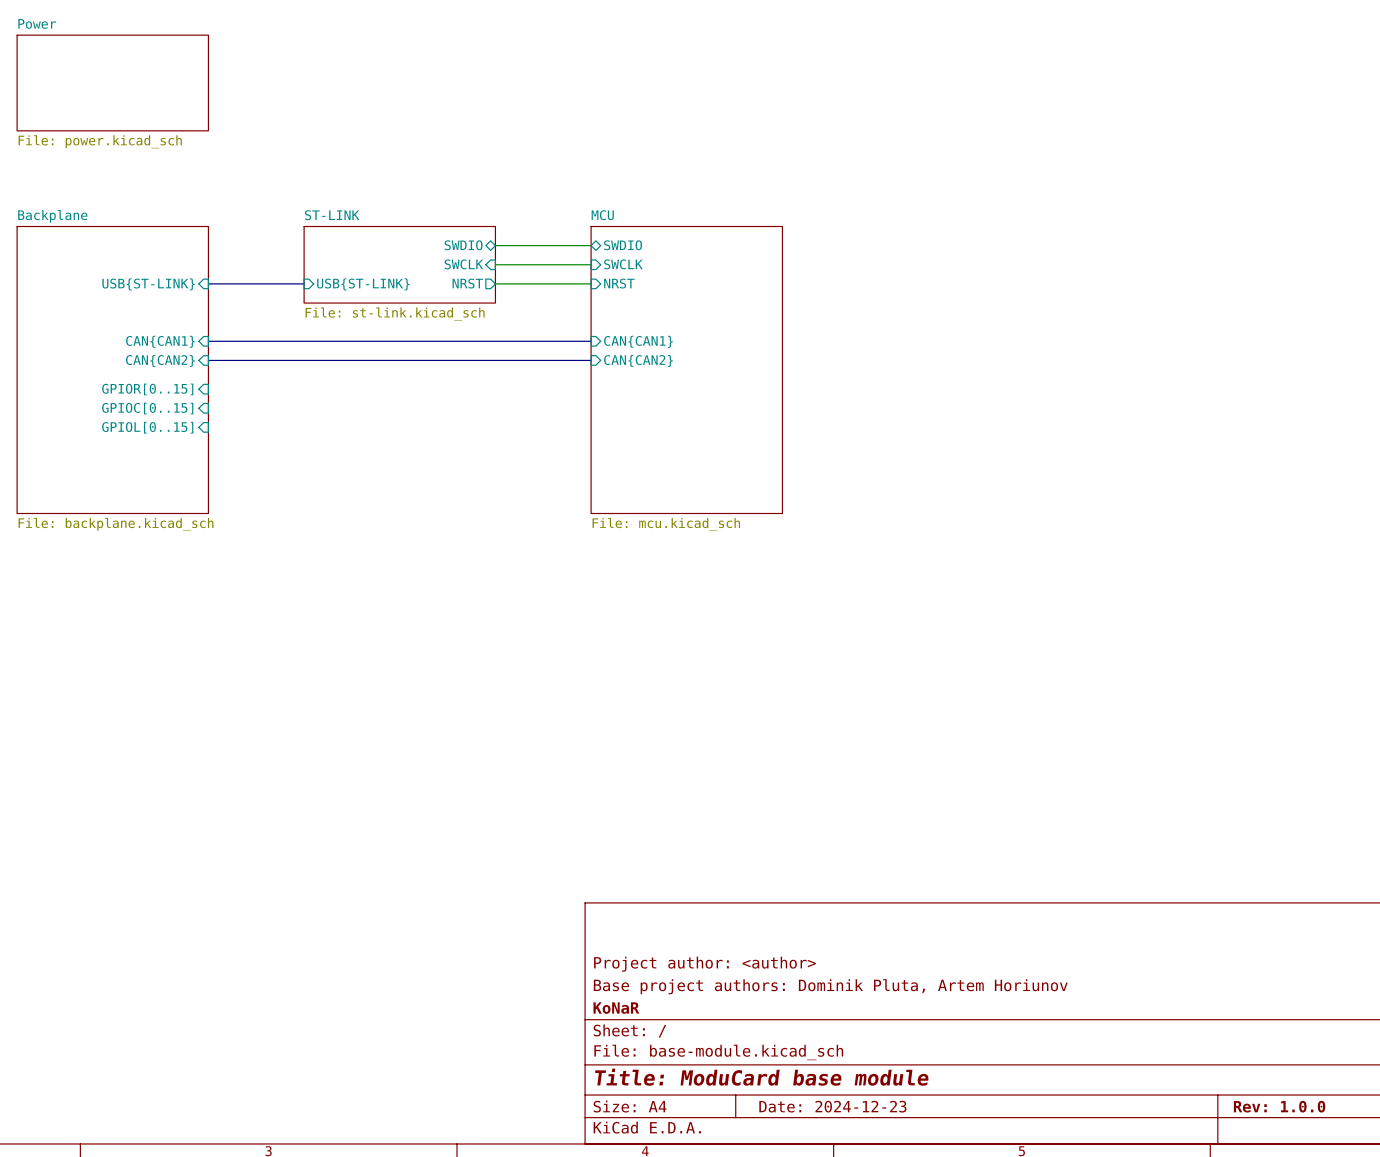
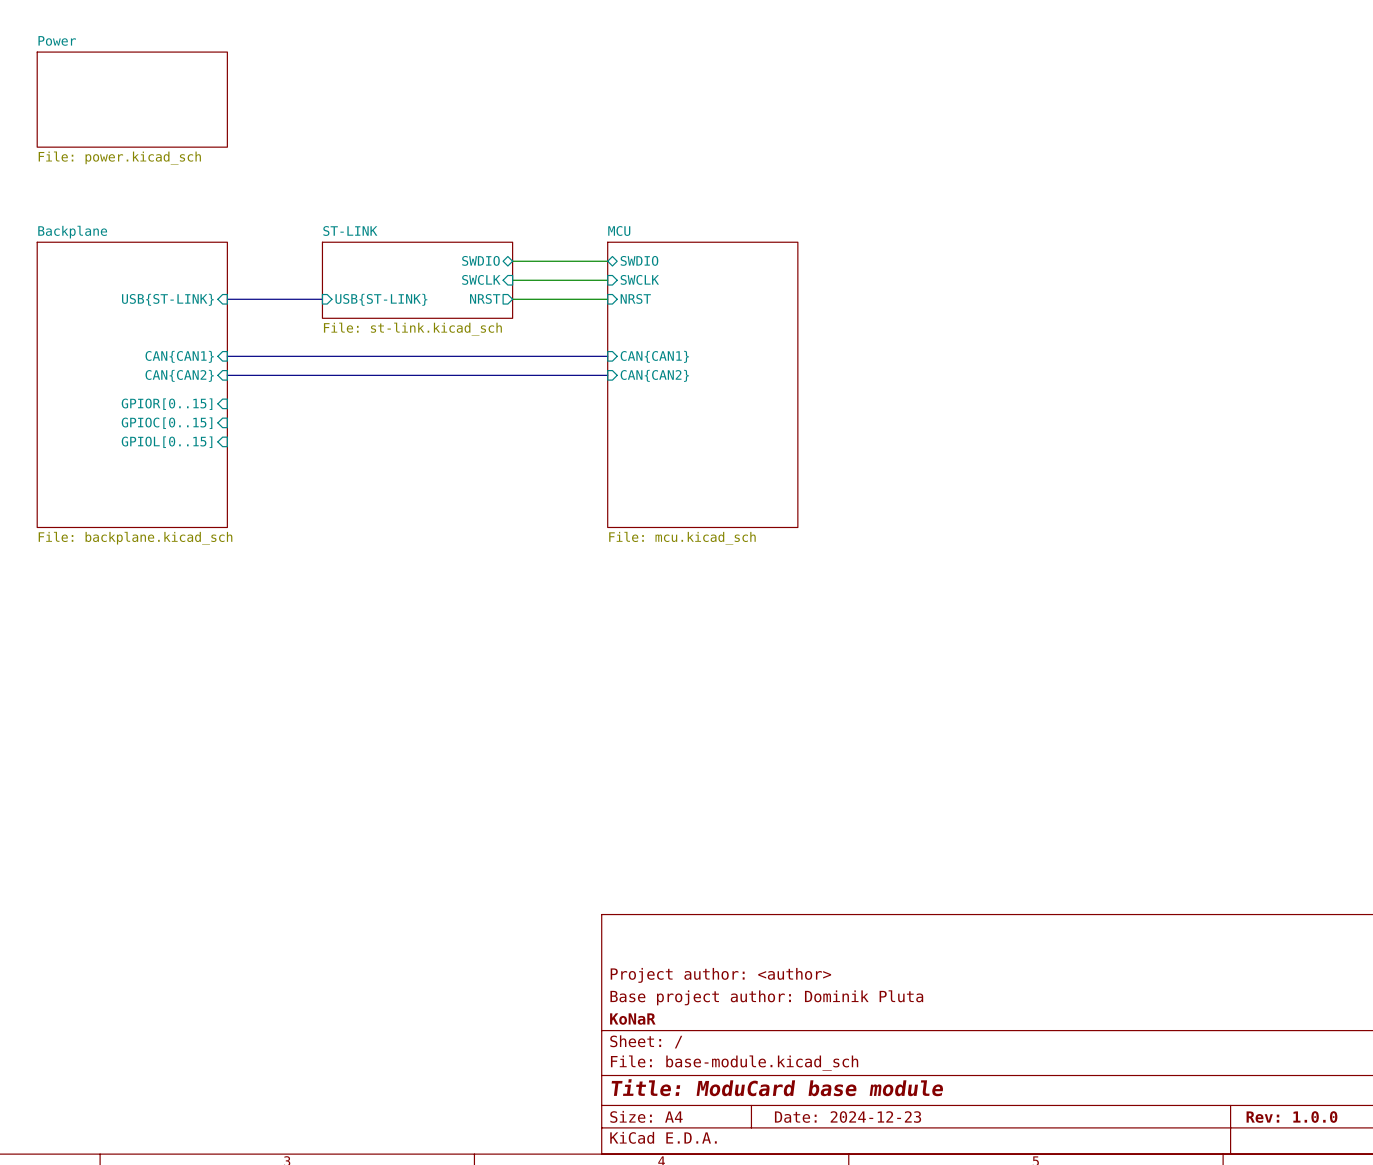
title block: Base project authors: Dominik Pluta, Artem Horiunov (830, 986) -> Base project author: Dominik Pluta (766, 997)

